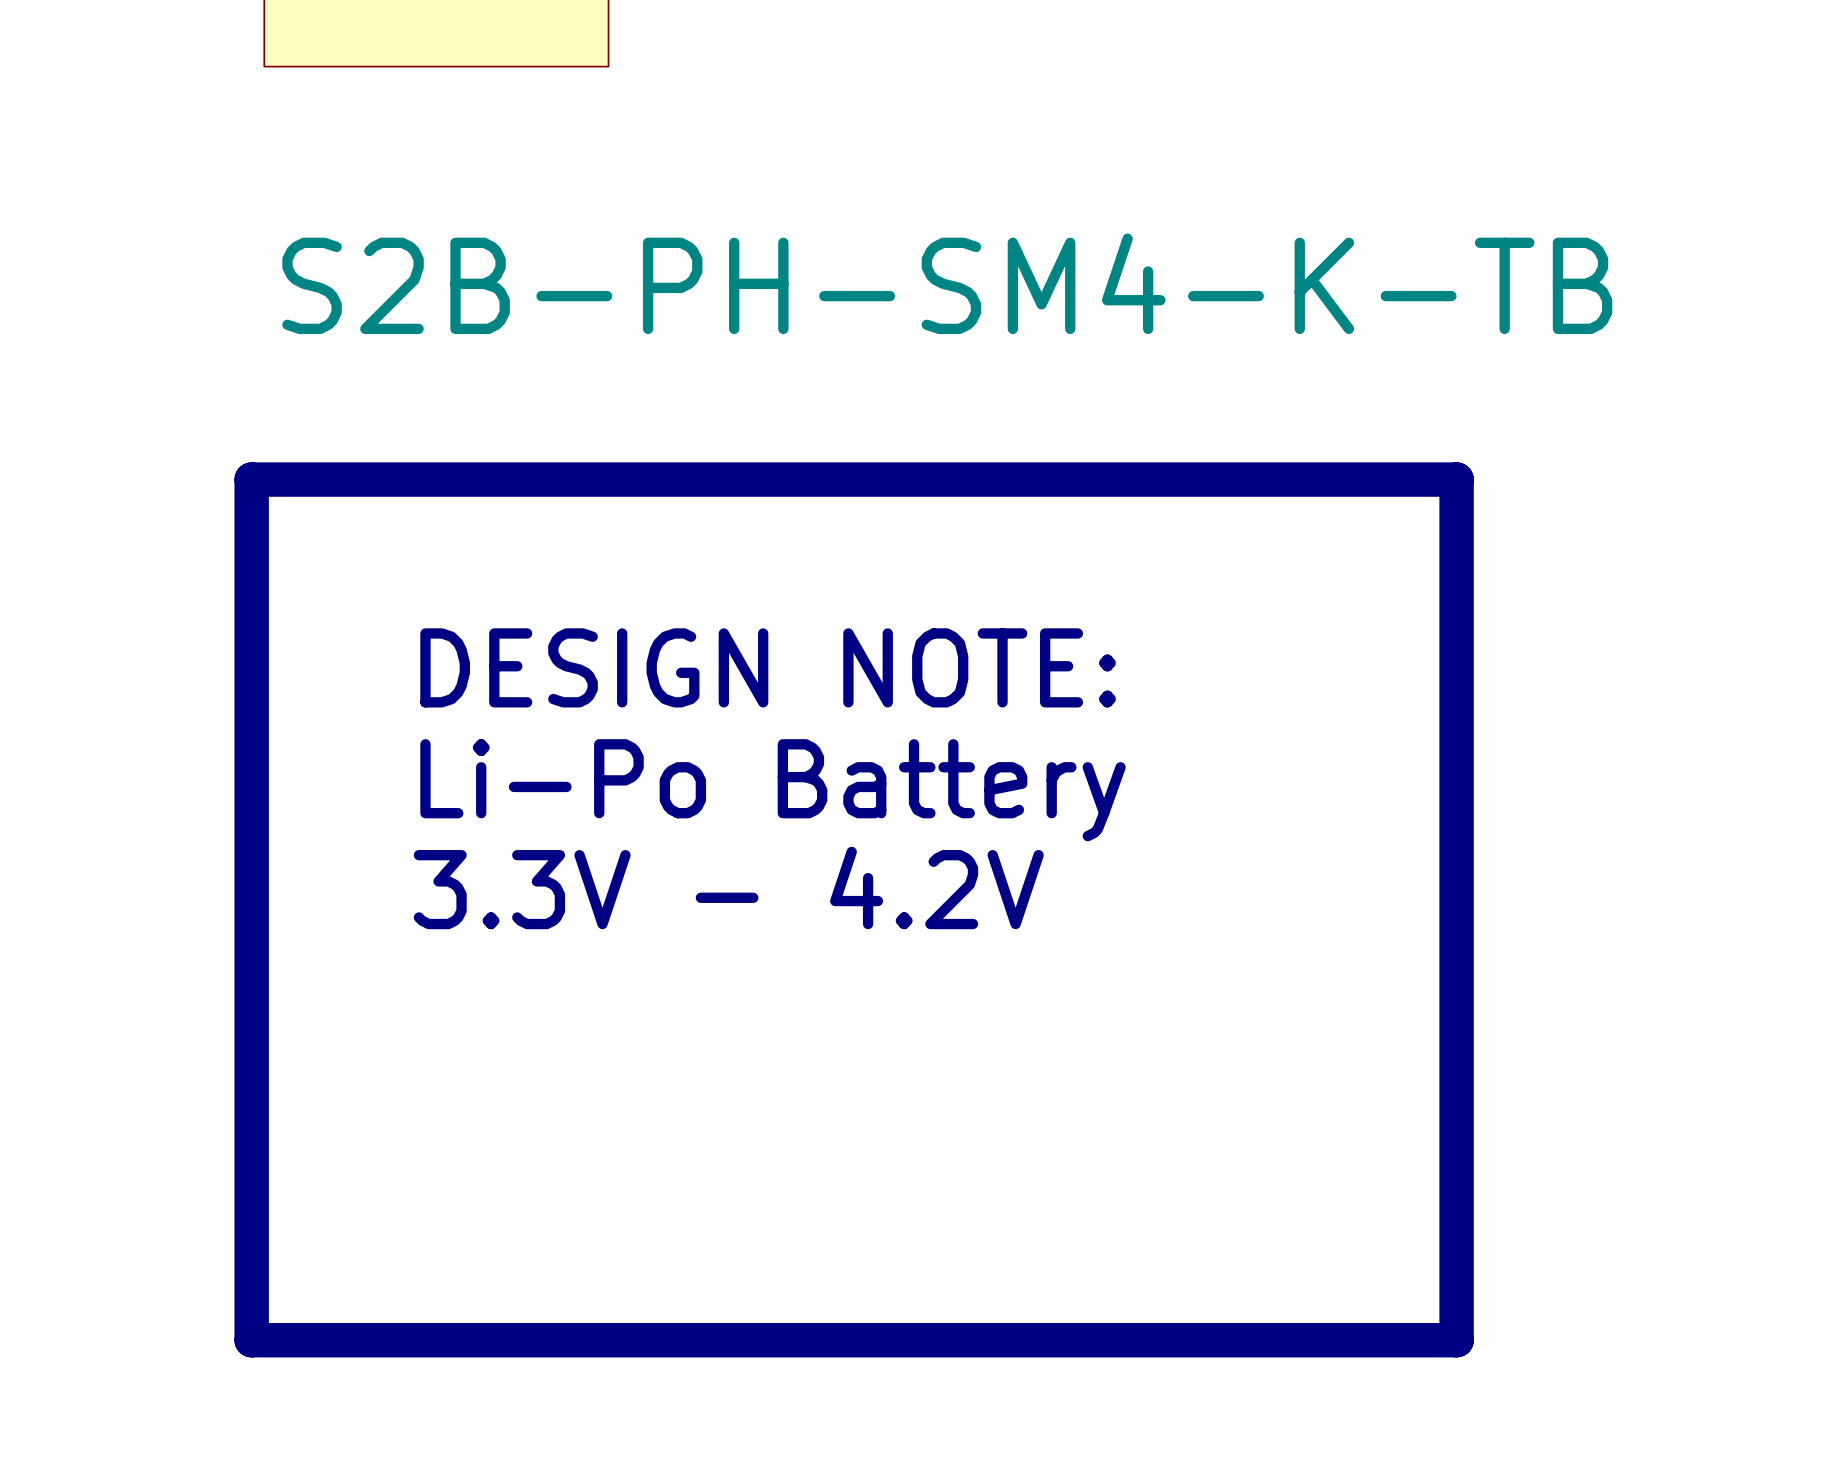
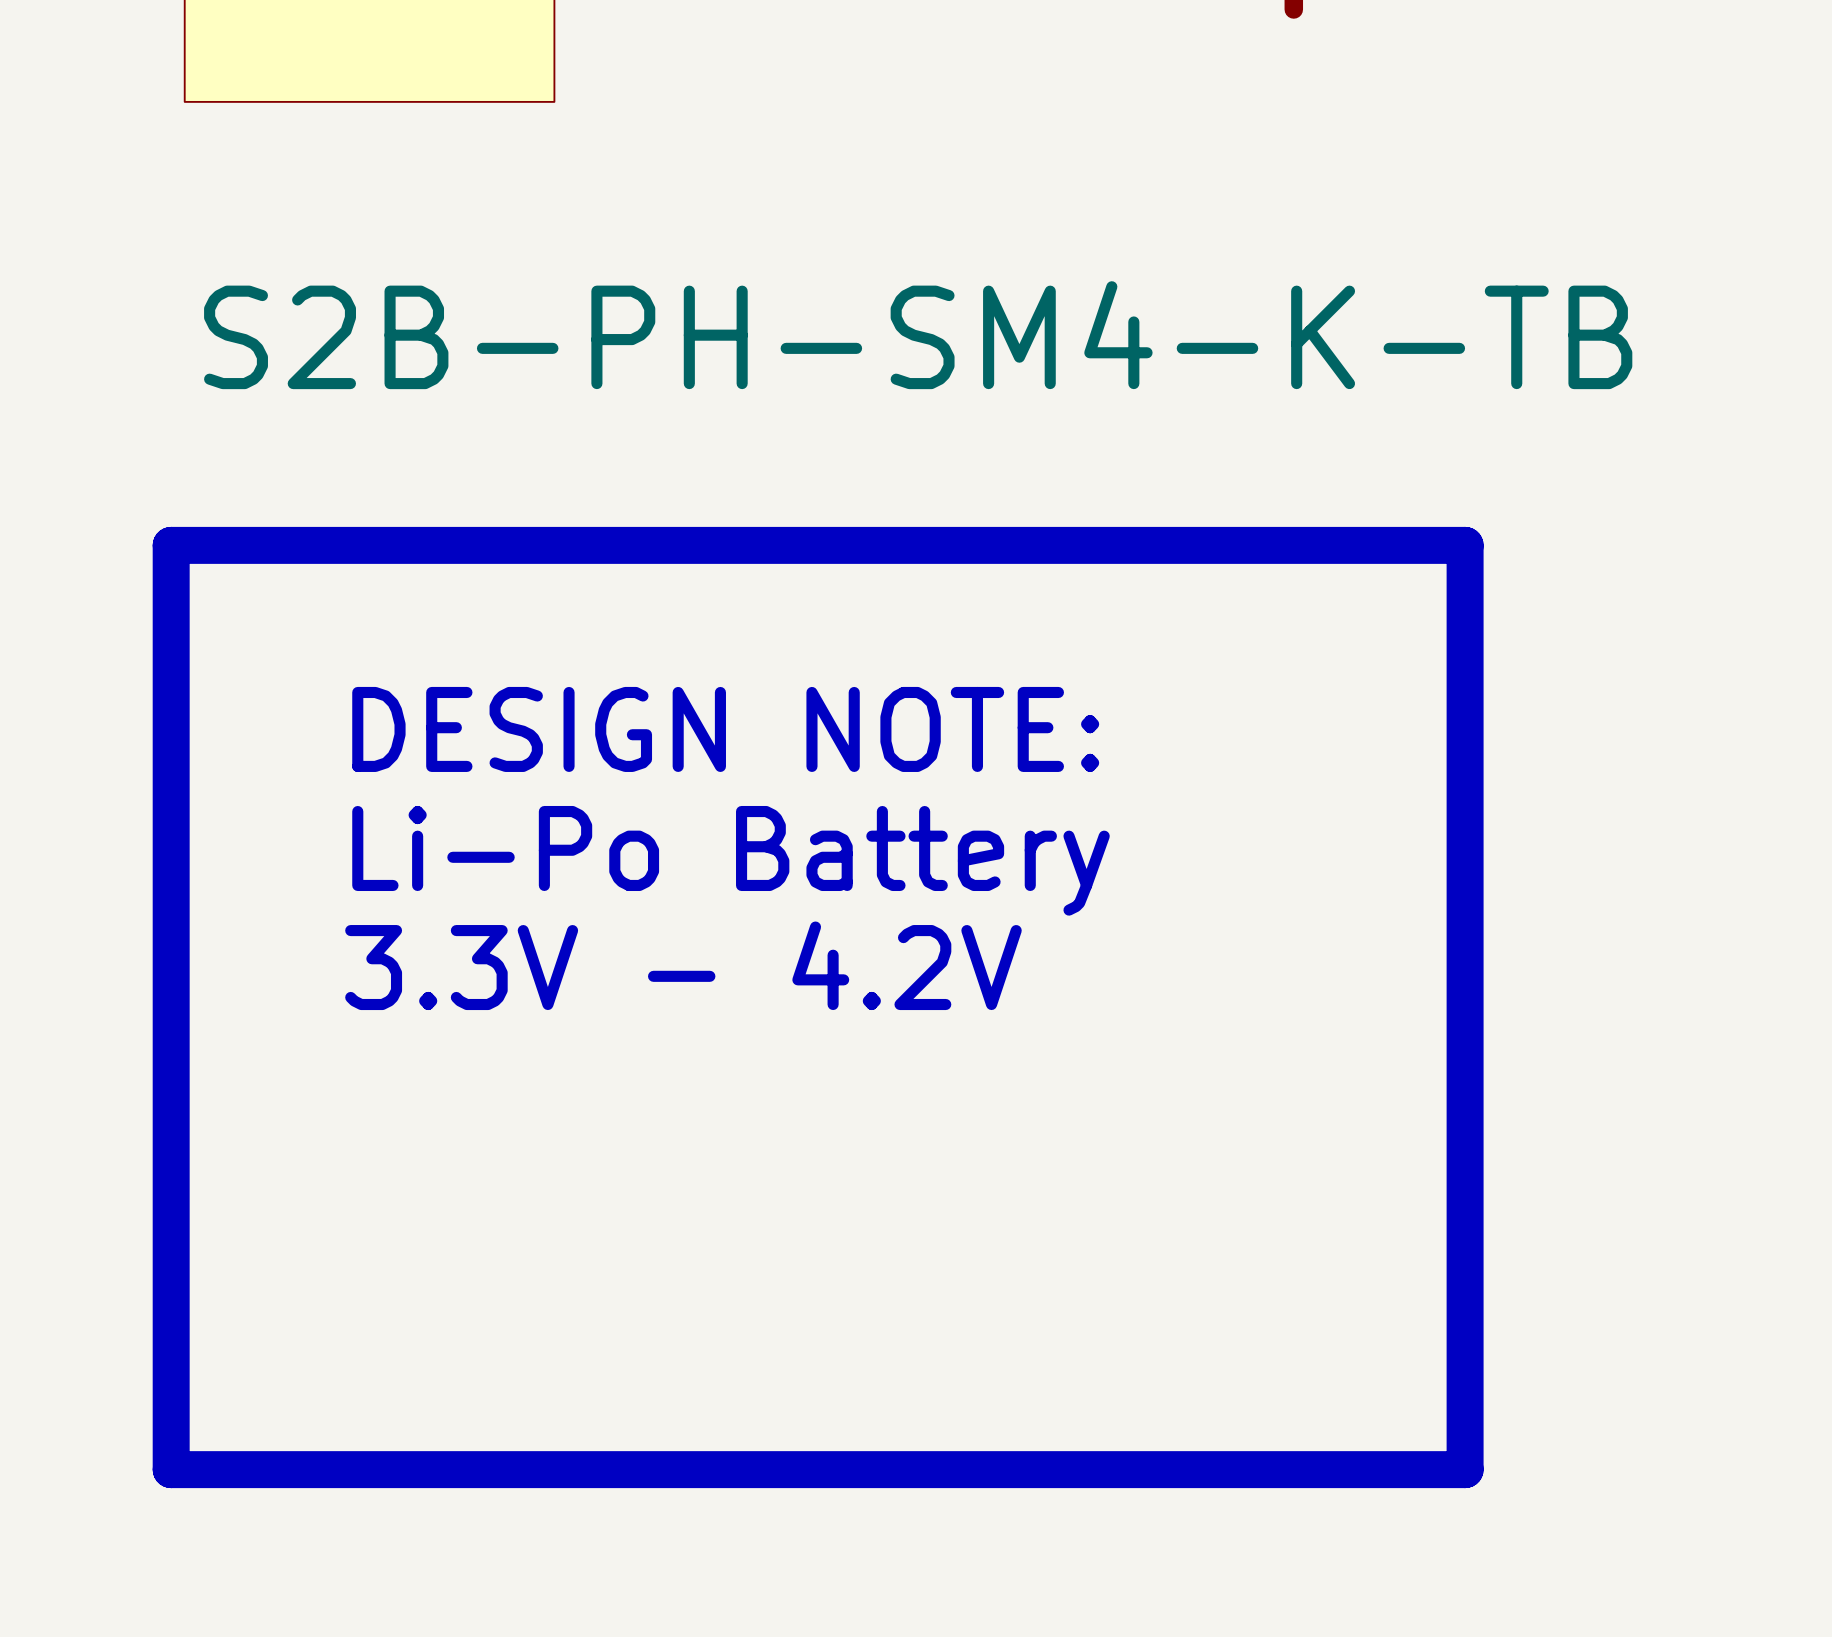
text position: DESIGN NOTE: (768, 667) -> DESIGN NOTE: (725, 729)
text position: Li-Po Battery (773, 790) -> Li-Po Battery (731, 860)
text position: 3.3V - 4.2V (728, 887) -> 3.3V - 4.2V (683, 965)

